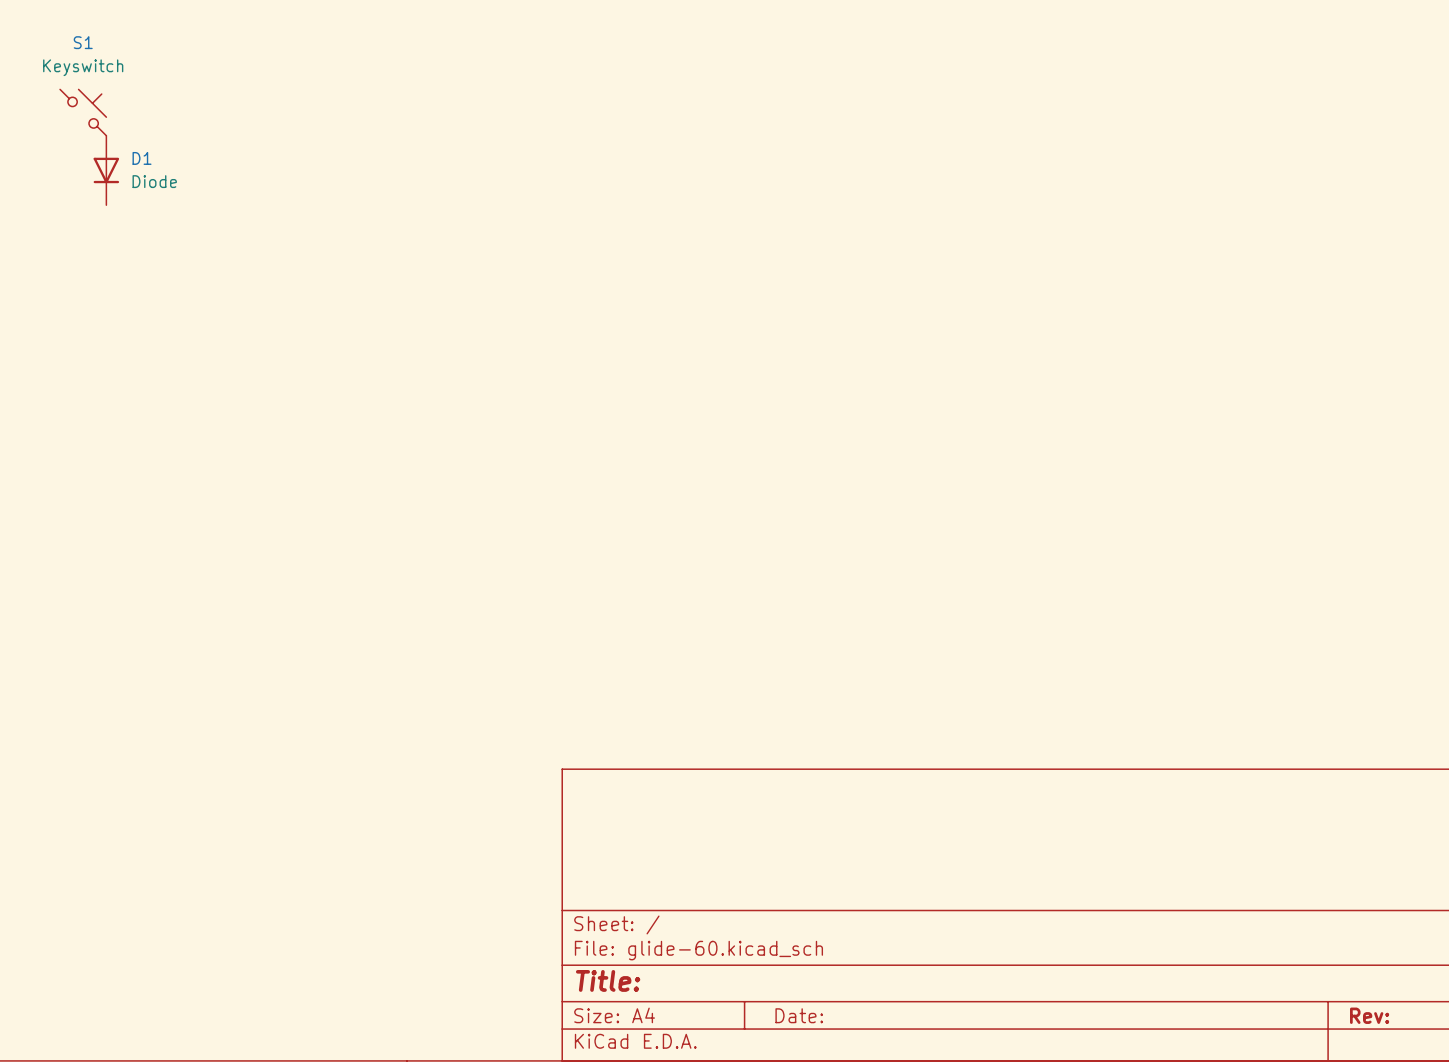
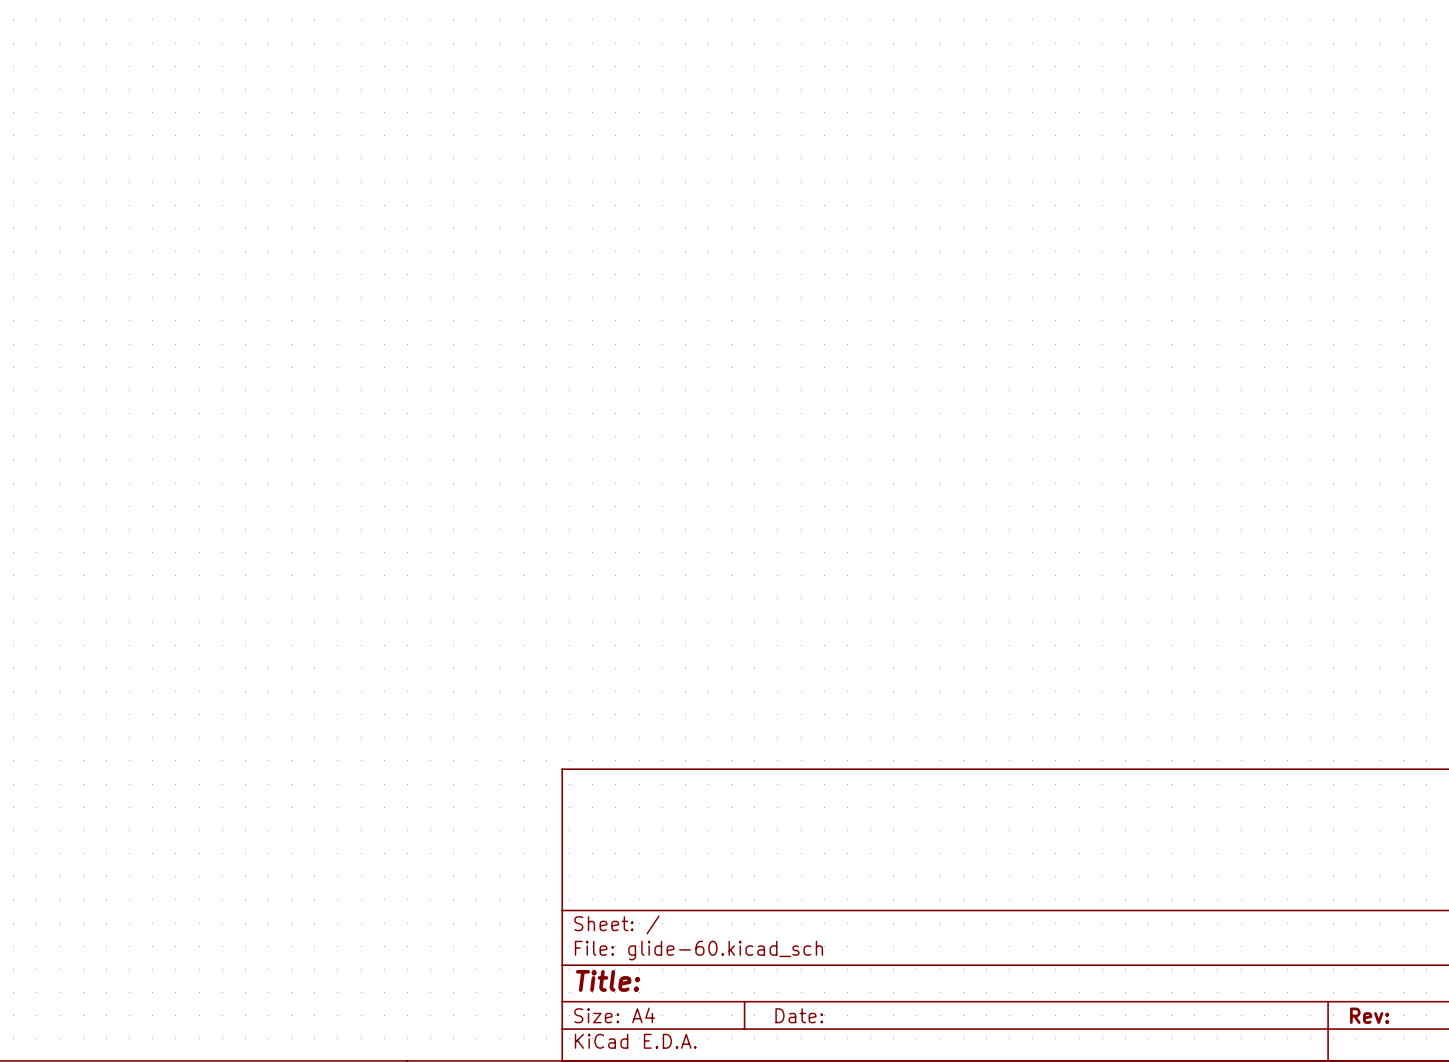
S1: Keyswitch (83, 112) -> none
D1: Diode (106, 170) -> none

